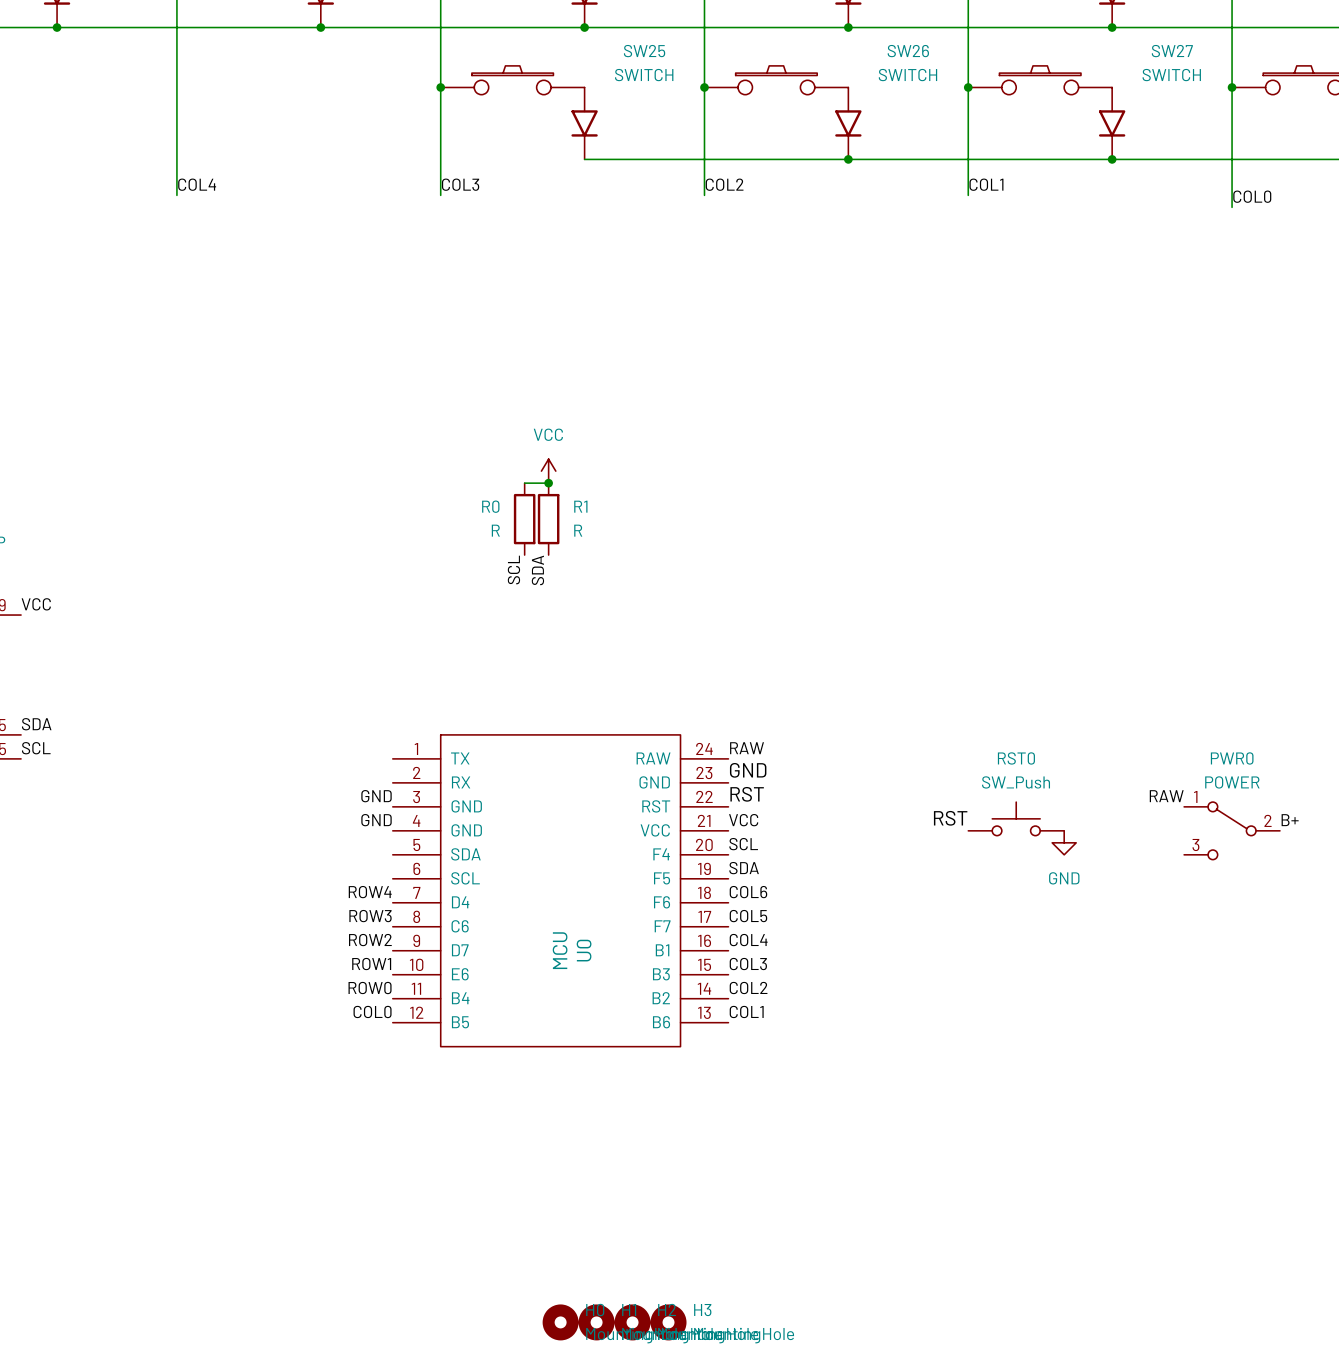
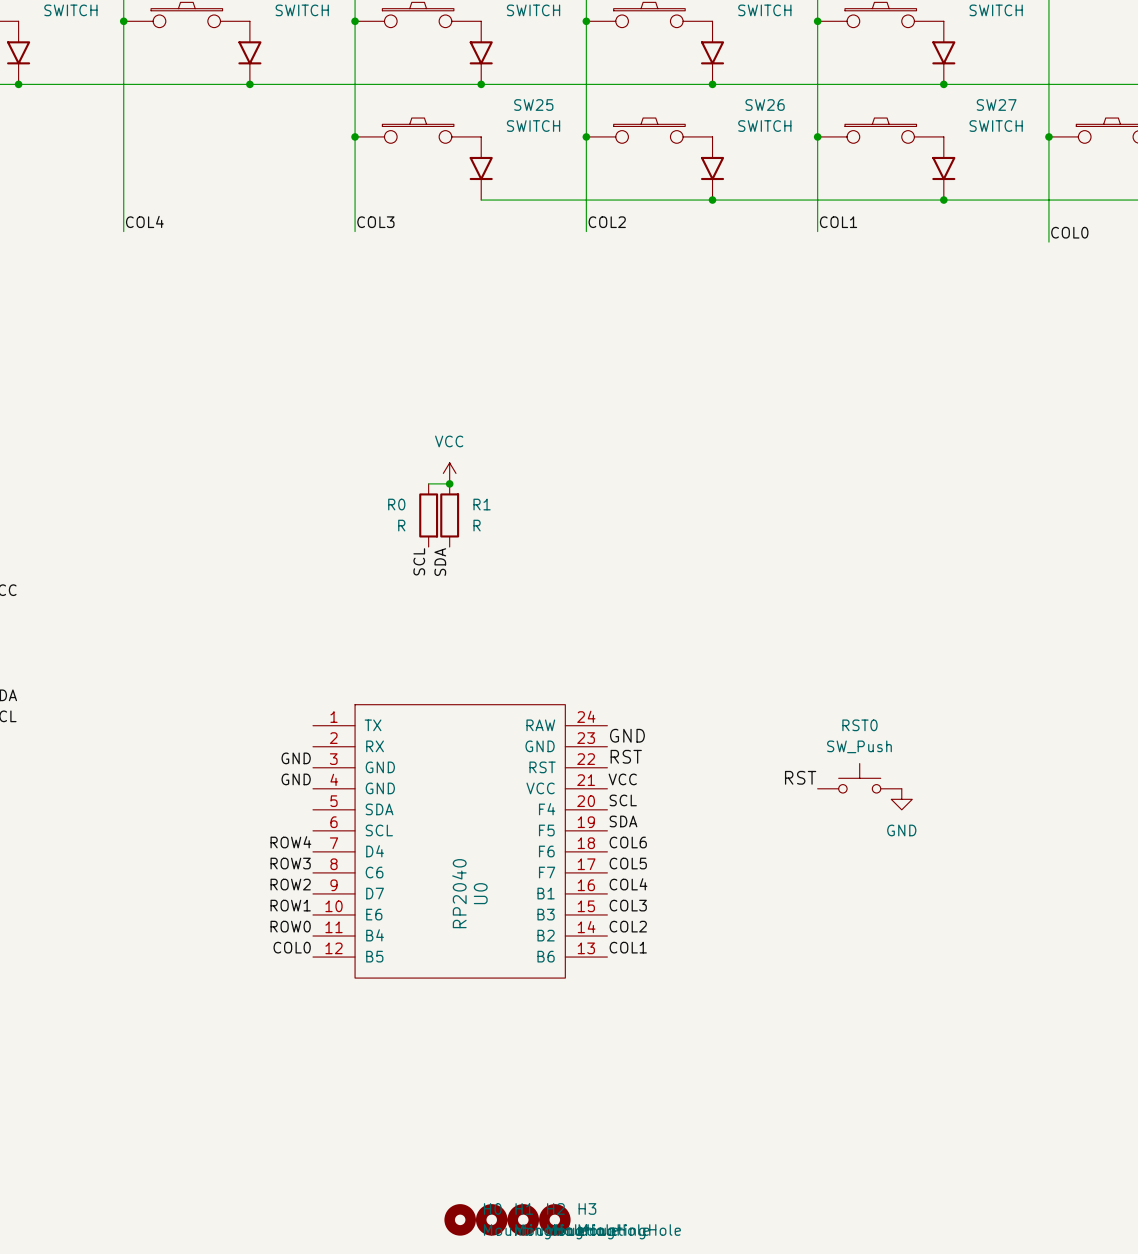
label: RAW (747, 748) -> none
label: RAW (1166, 796) -> none
label: B+ (1290, 820) -> none
PWR0: POWER (1232, 830) -> none
U0 value: MCU (560, 950) -> RP2040 (459, 893)

